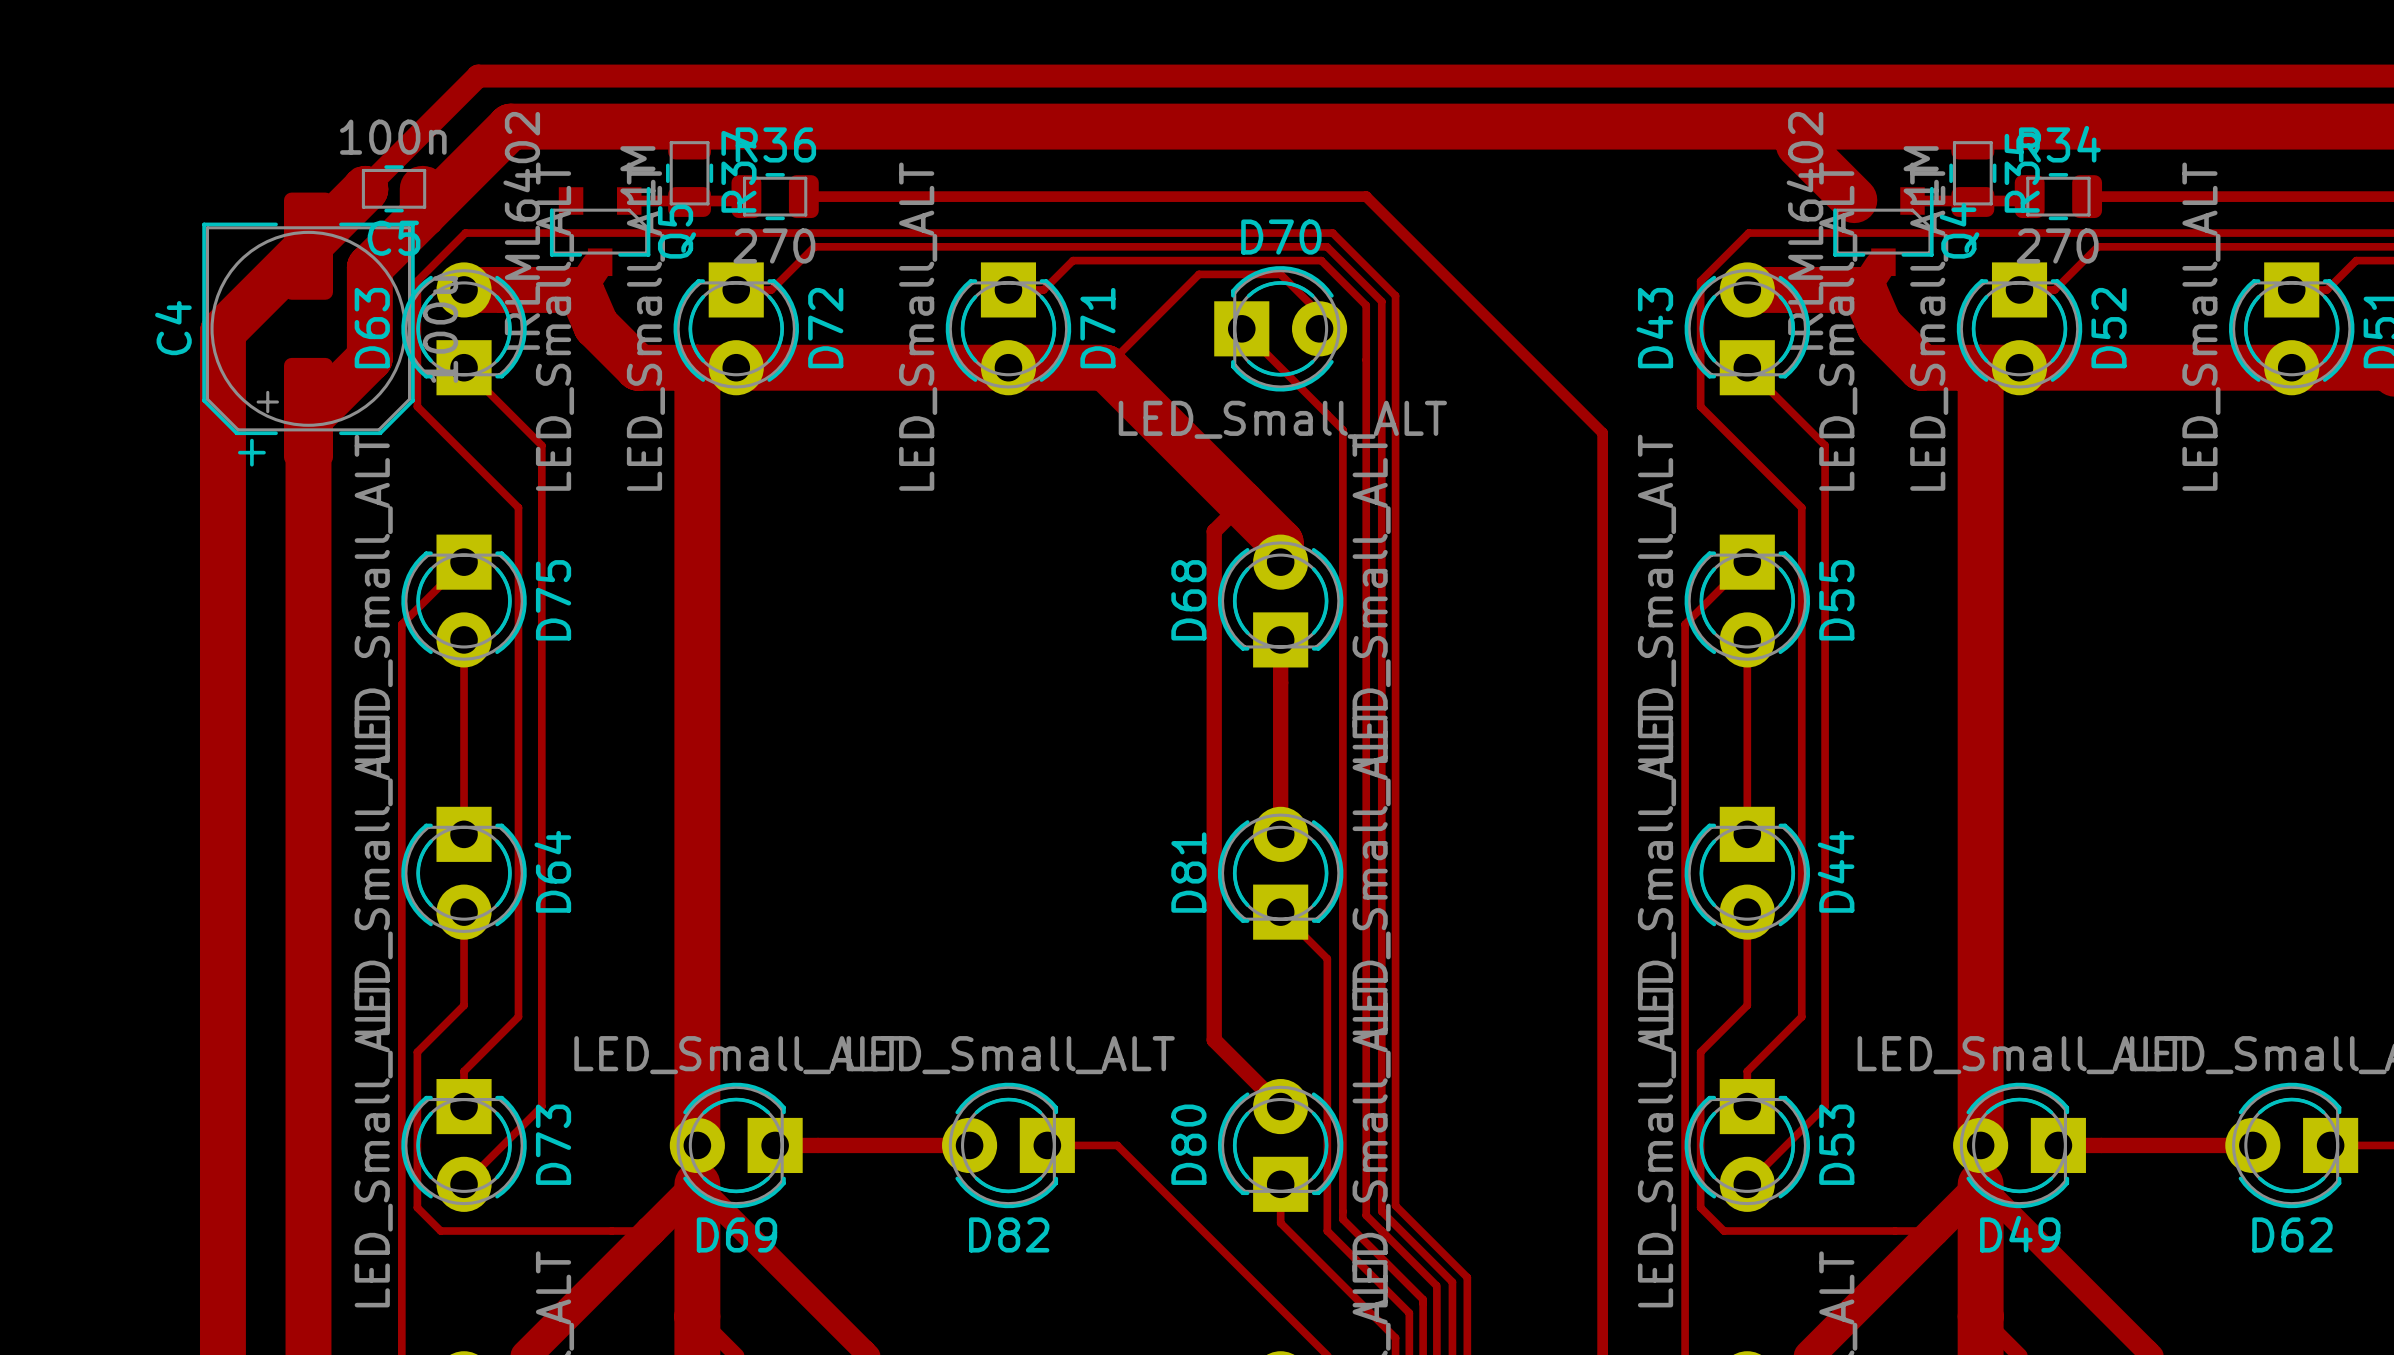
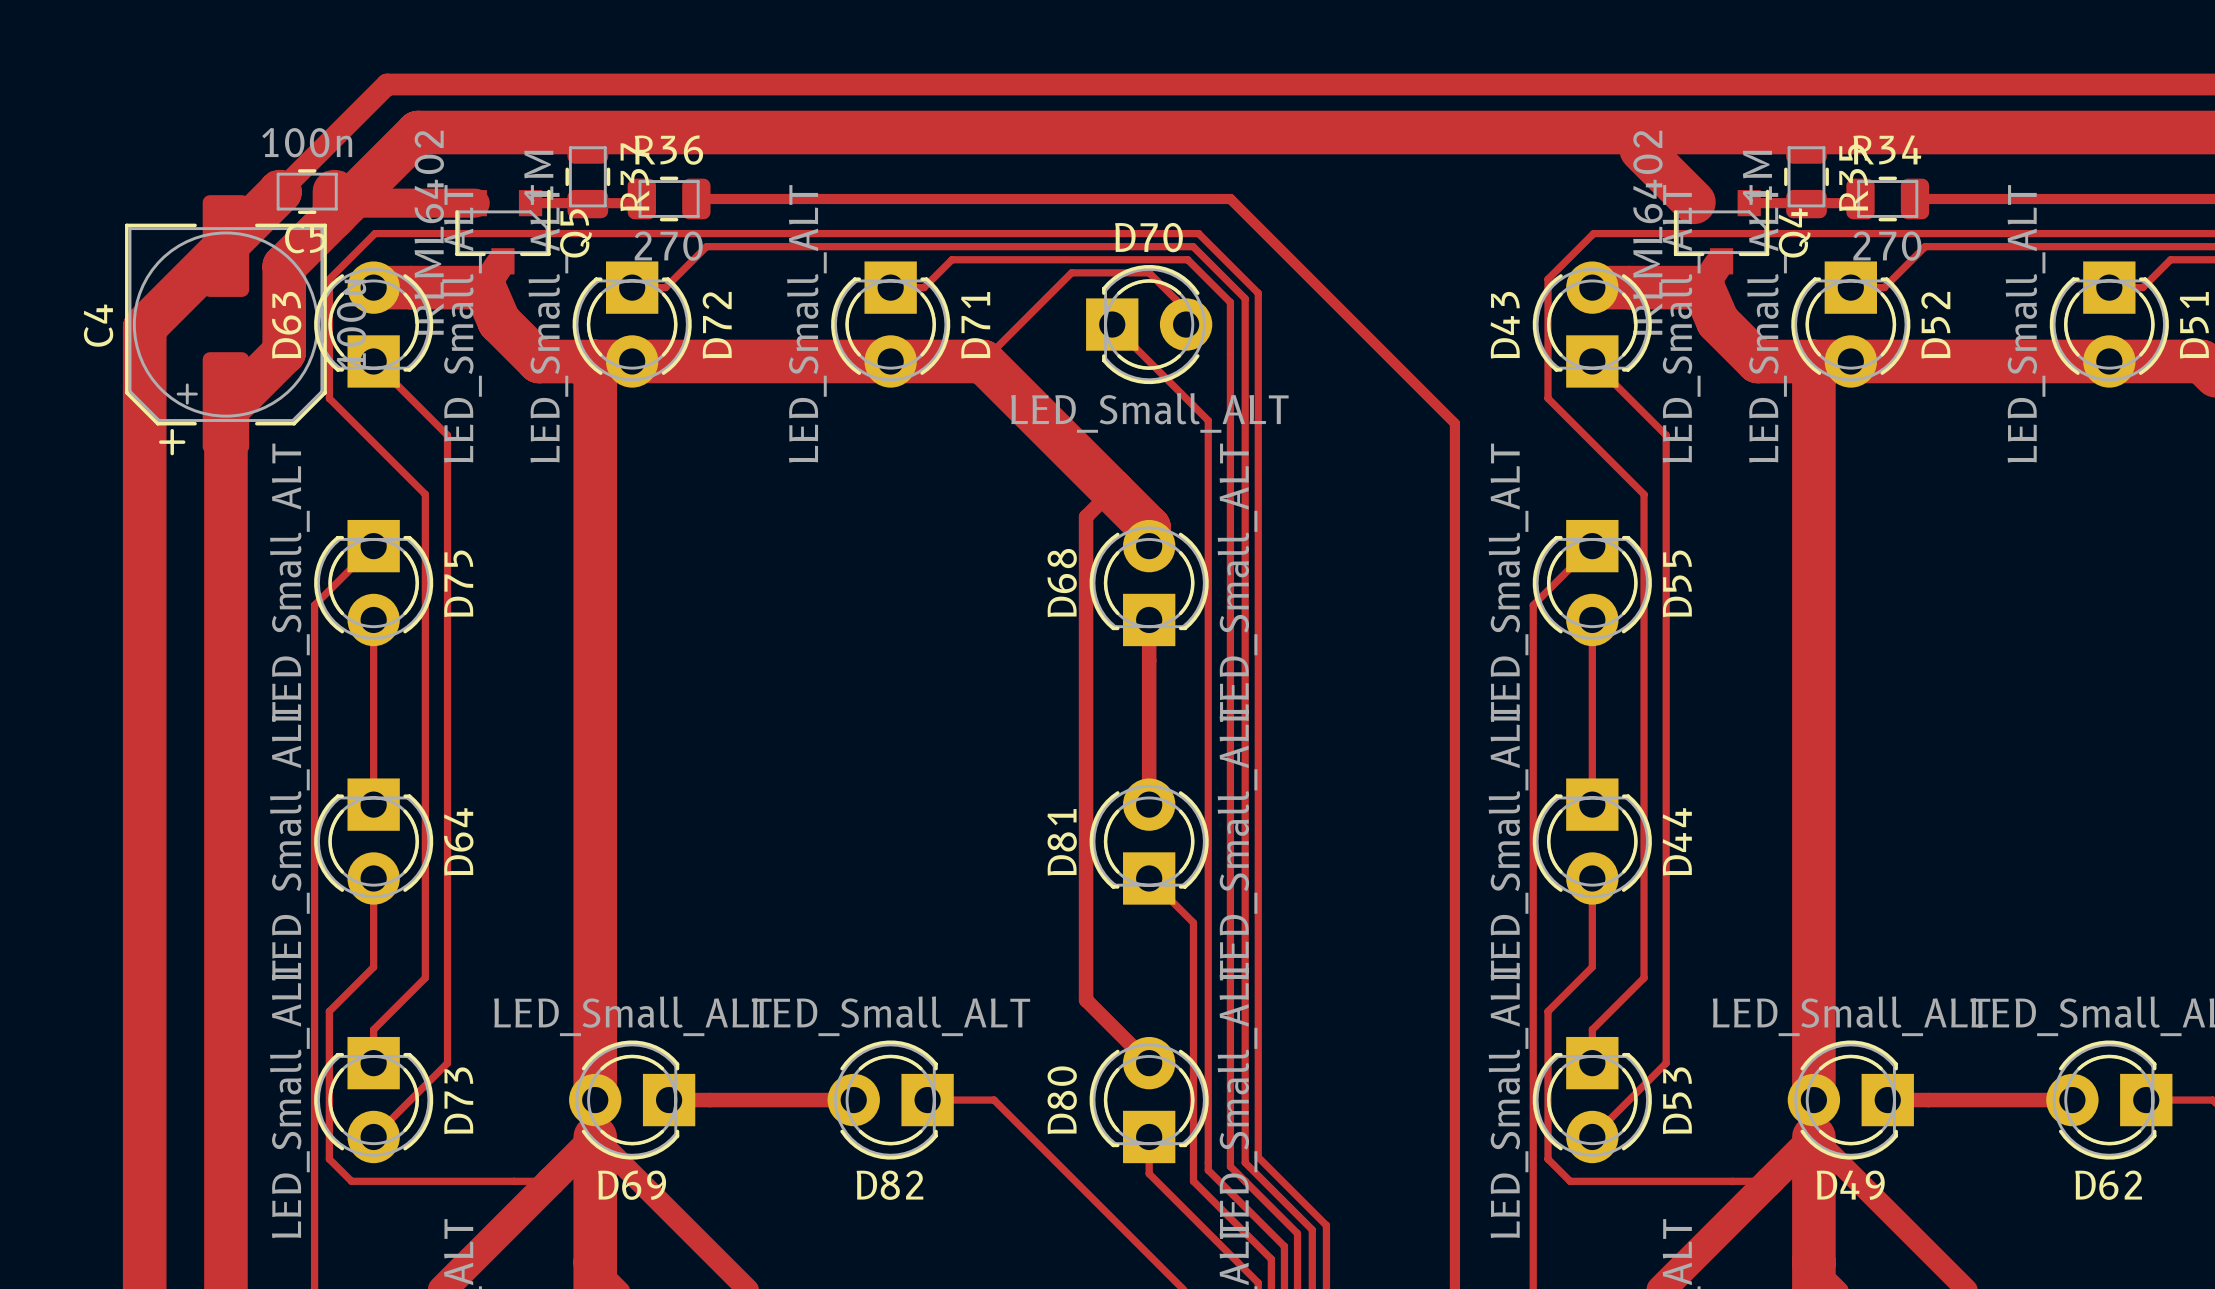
track: none -> (345, 203) (475, 203)

